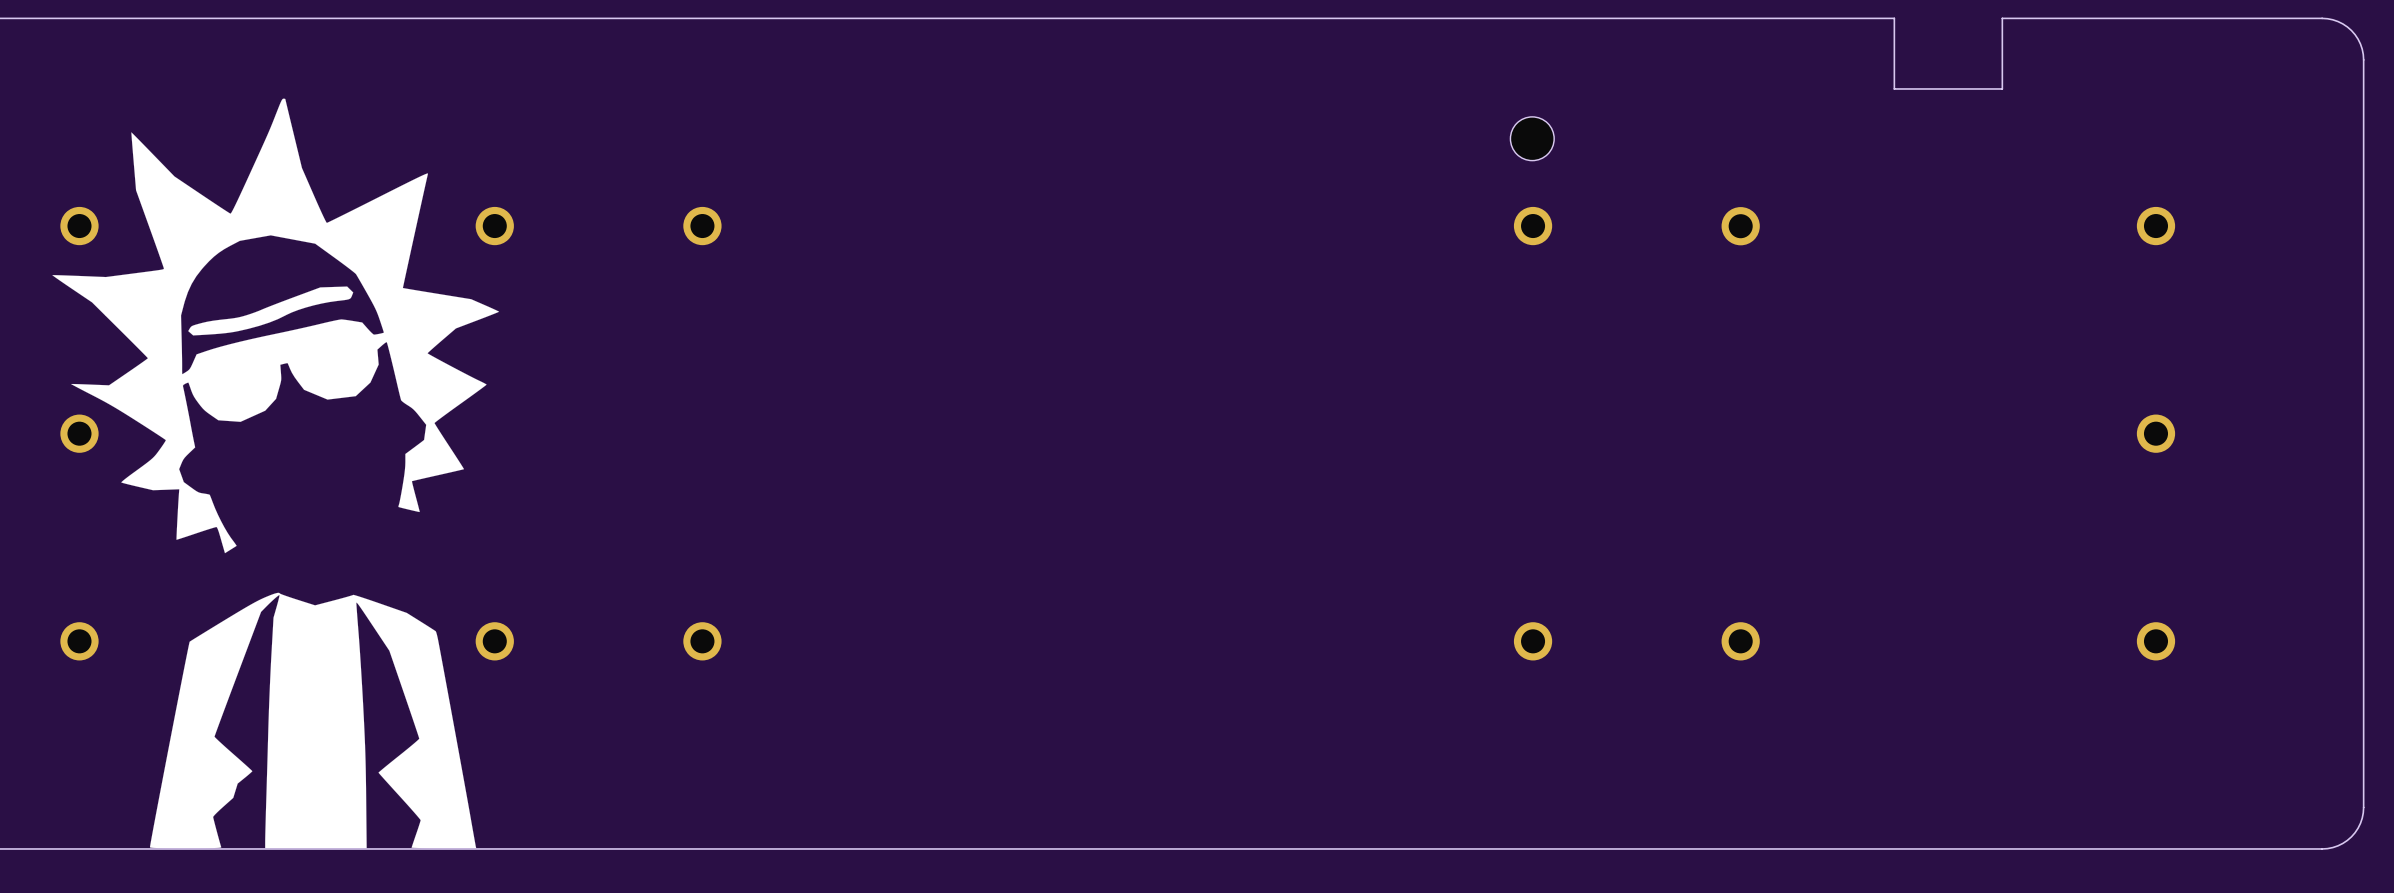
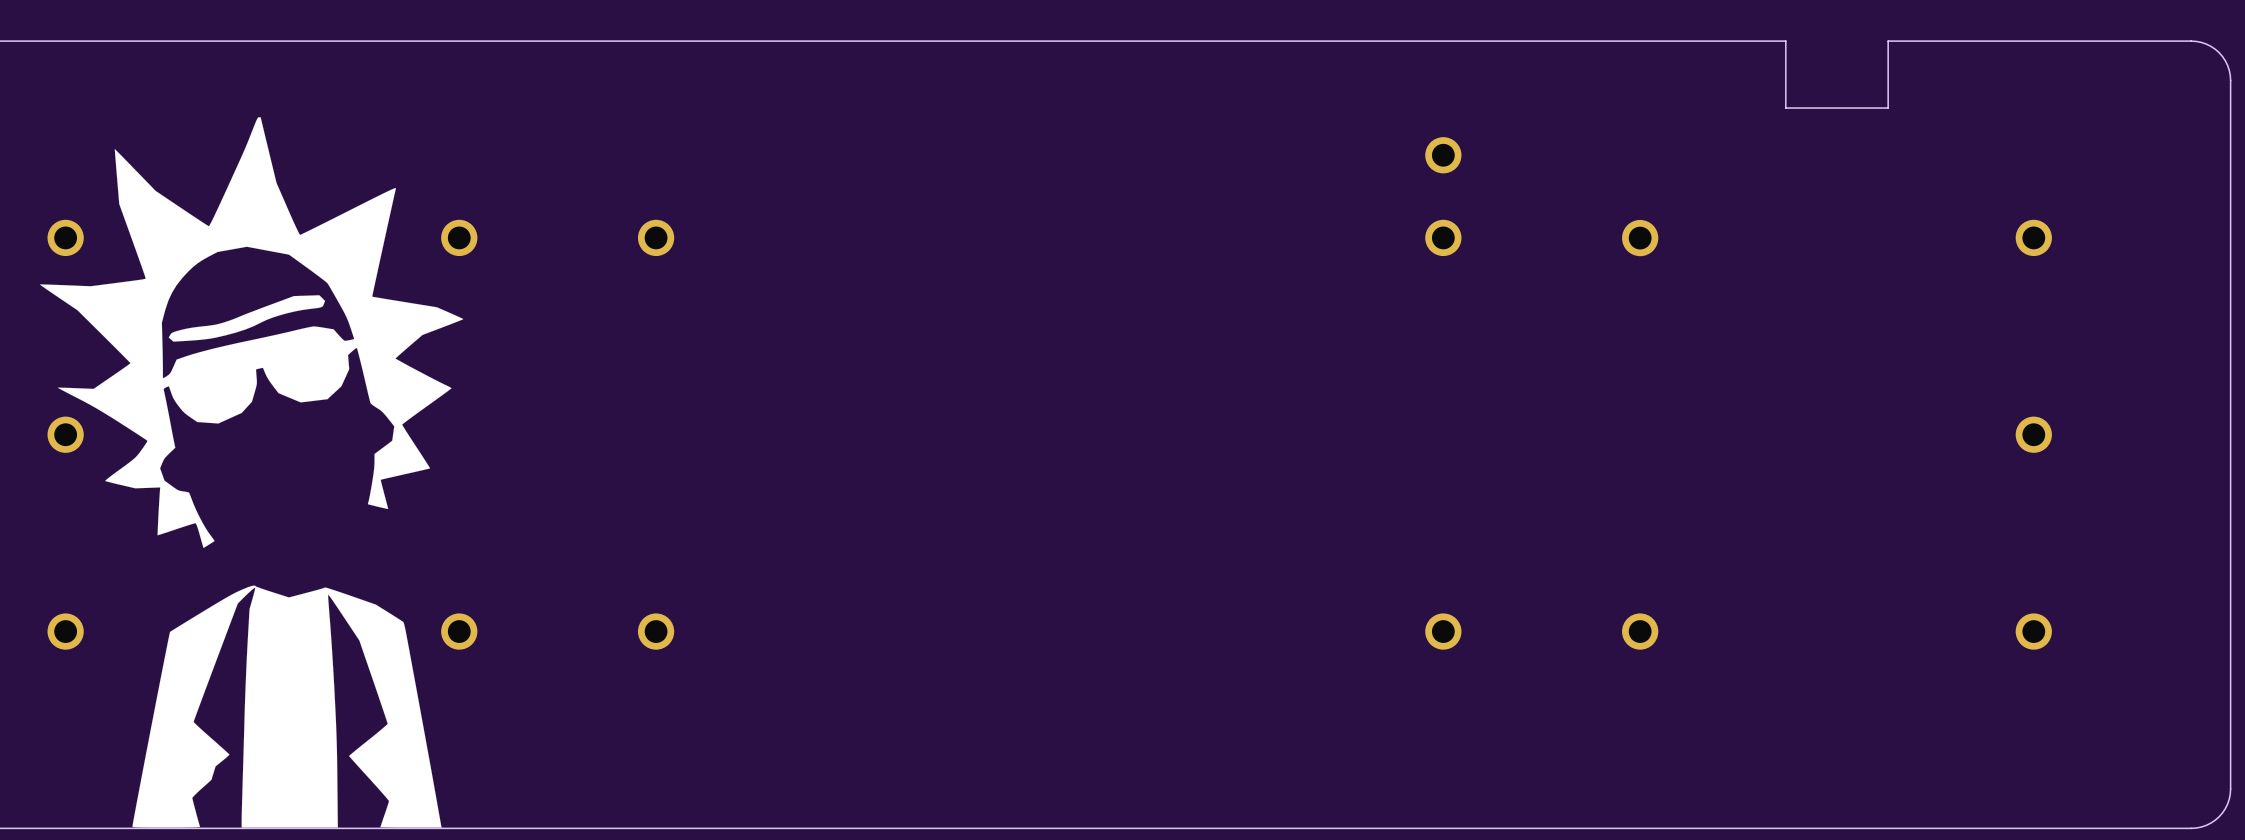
part footprint: [1510, 116, 1555, 161] -> [1425, 137, 1462, 174]

